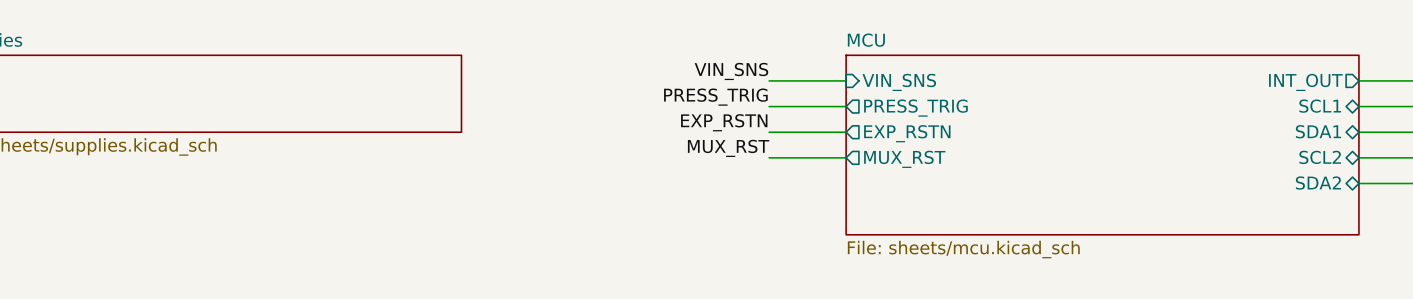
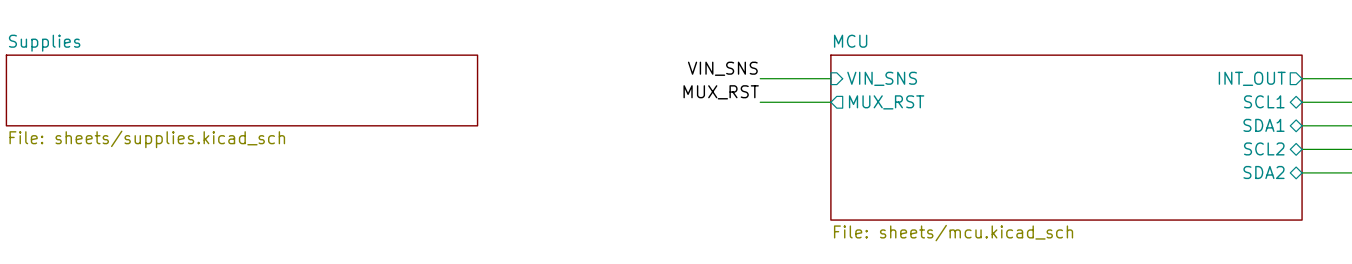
label: PRESS_TRIG (715, 97) -> MUX_RST (721, 92)
sheet pin: PRESS_TRIG (915, 108) -> MUX_RST (886, 102)
label: EXP_RSTN (724, 122) -> none
wire: (769, 132) (846, 132) -> none
sheet pin: EXP_RSTN (907, 133) -> none
label: MUX_RST (728, 148) -> none
wire: (769, 157) (846, 157) -> none
sheet pin: MUX_RST (904, 159) -> none

